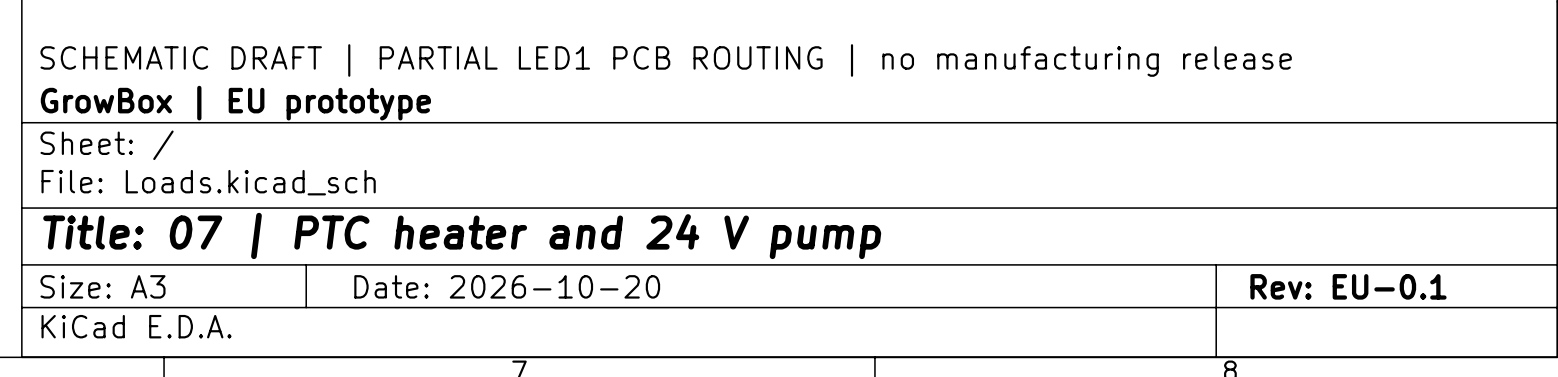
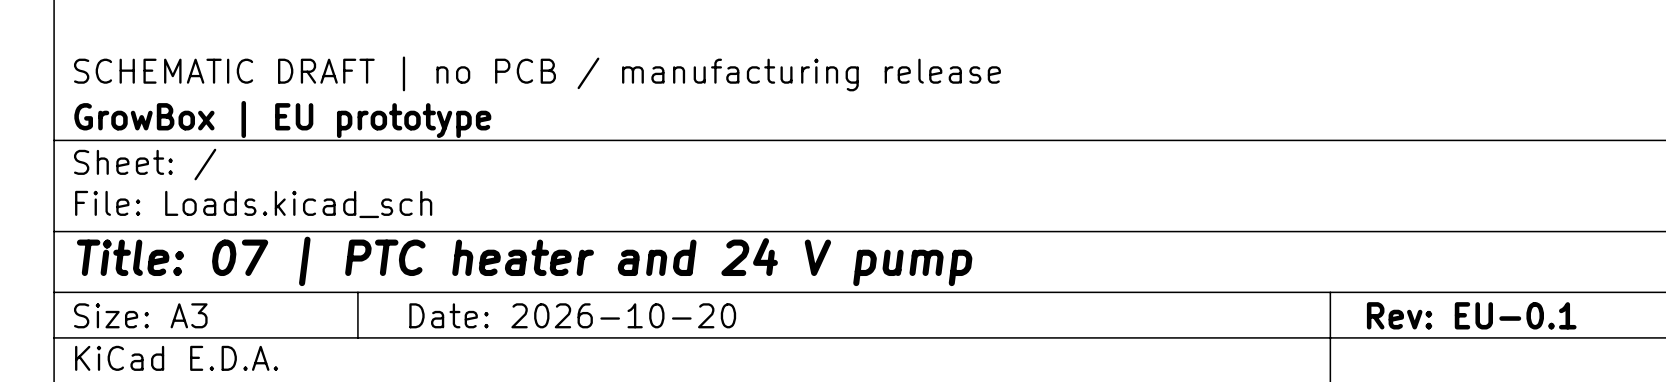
title block: SCHEMATIC DRAFT | PARTIAL LED1 PCB ROUTING | no manufacturing release (666, 60) -> SCHEMATIC DRAFT | no PCB / manufacturing release (537, 73)

